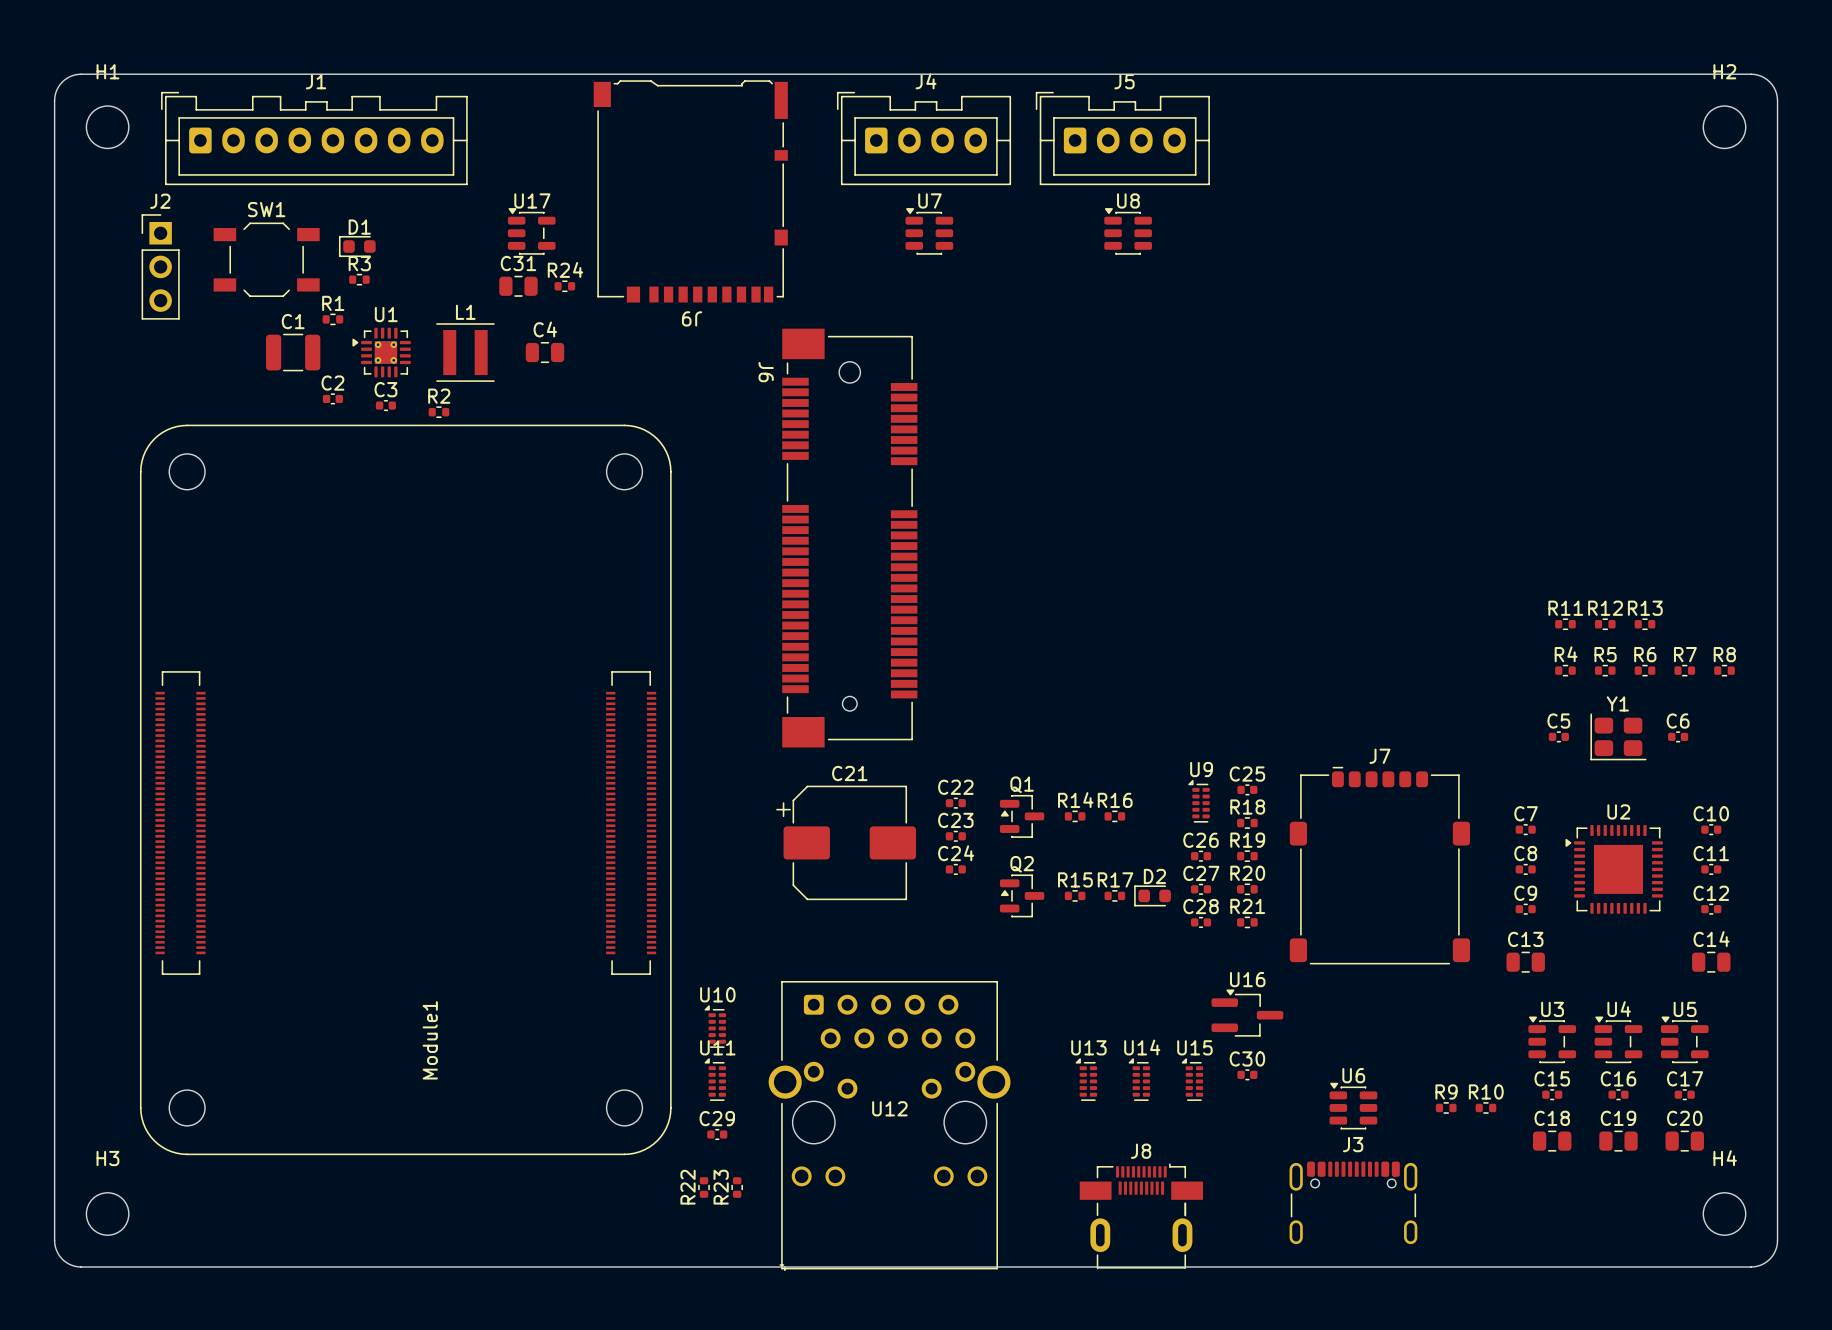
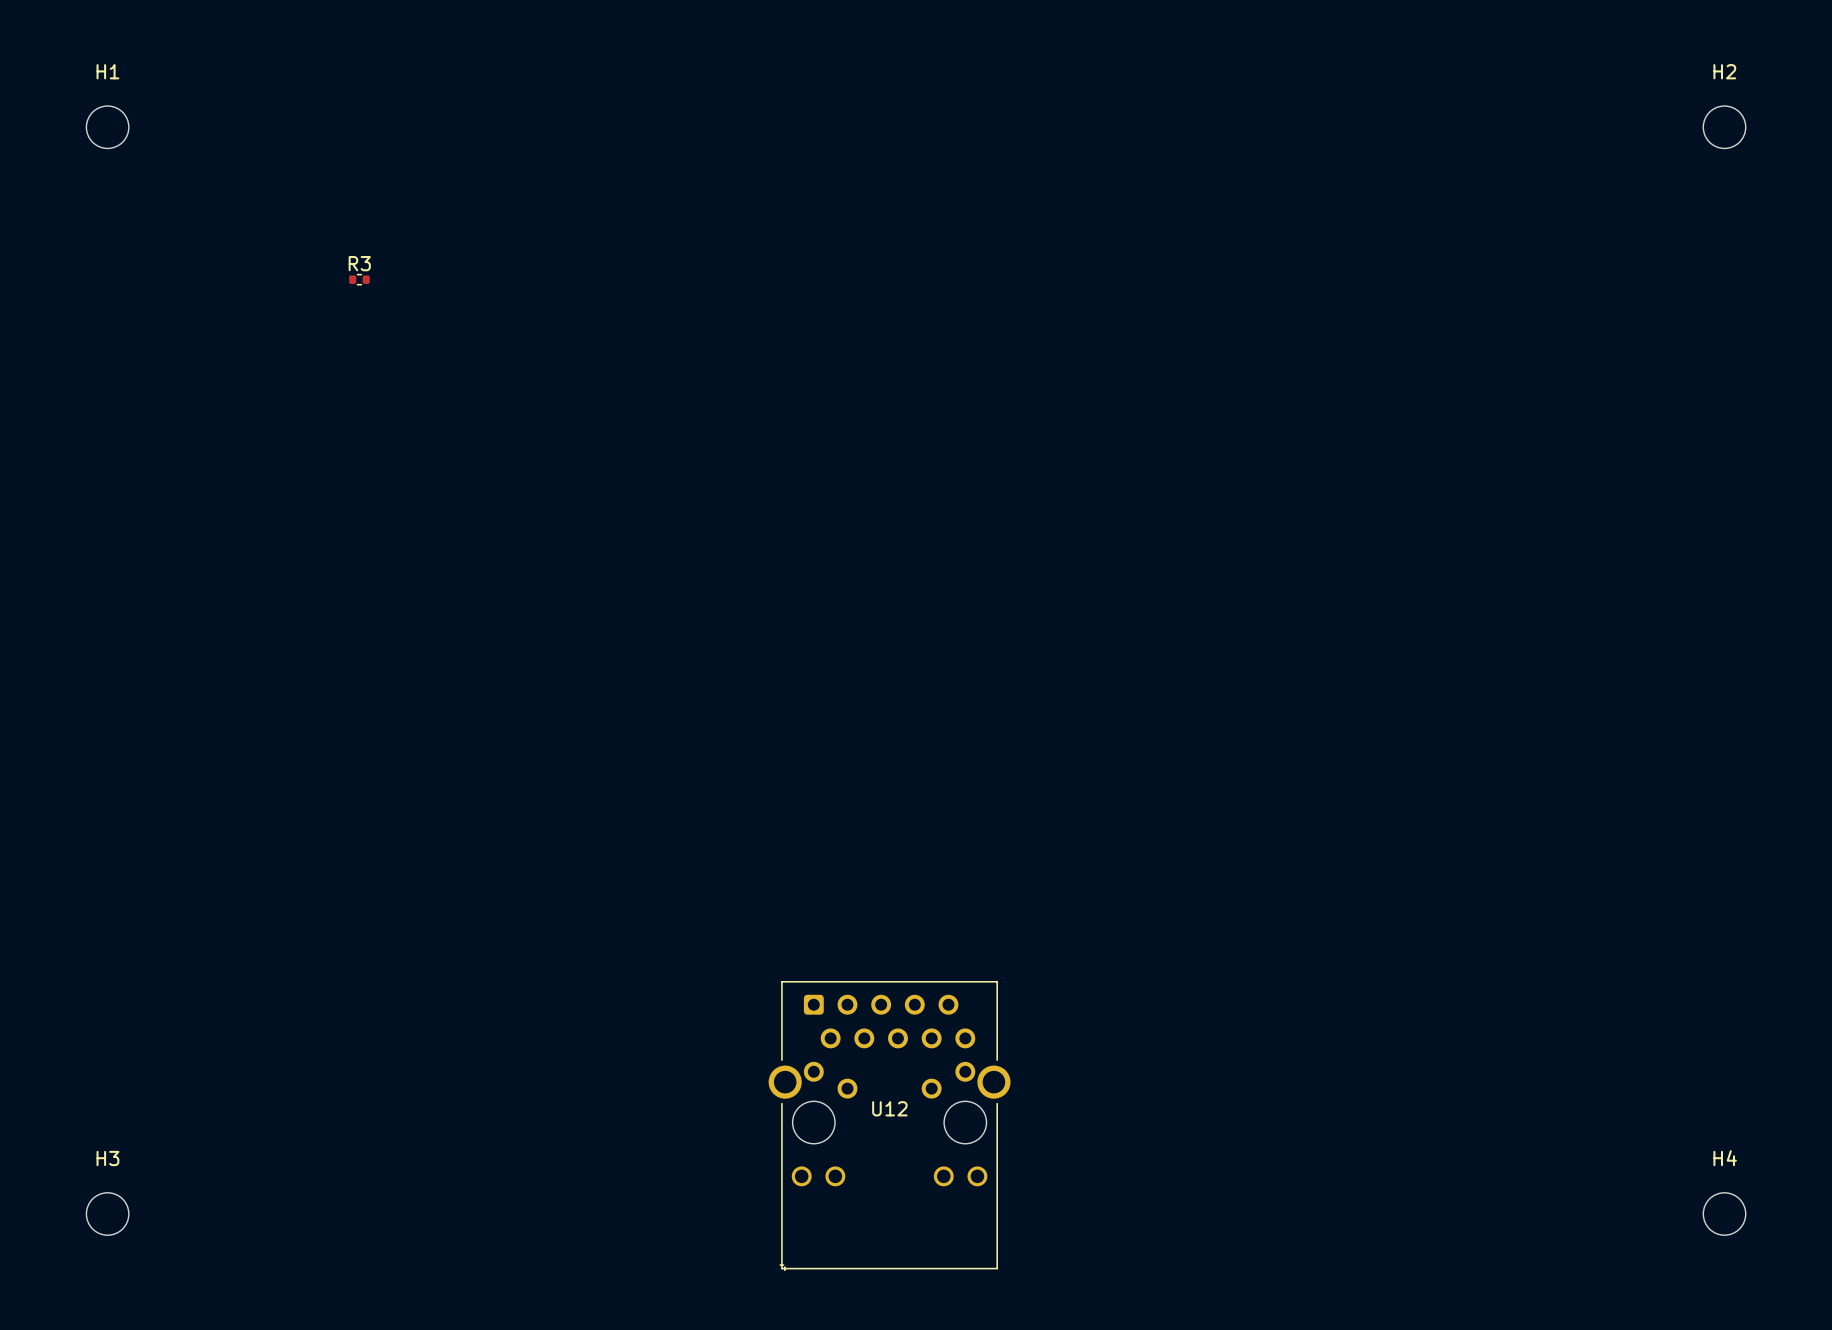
board edge: (81, 74) (1751, 74) (1767, 79) (1773, 87) (1777, 100) (1777, 1240) (1772, 1256) (1761, 1264) (1751, 1267) (81, 1267) (64, 1261) (58, 1253) (54, 1240) (54, 100) (57, 89) (62, 81) (69, 76) (81, 74) -> none
J1: (314, 138) -> none
J4: (924, 138) -> none
J5: (1122, 138) -> none
J9: (690, 191) -> none
U17: (531, 231) -> none
U7: (929, 231) -> none
U8: (1128, 231) -> none
D1: (357, 246) -> none
SW1: (266, 259) -> none
J2: (160, 266) -> none
C31: (518, 286) -> none
R24: (564, 286) -> none
R1: (332, 319) -> none
C1: (293, 352) -> none
U1: (381, 352) -> none
L1: (465, 352) -> none
C4: (544, 352) -> none
C2: (332, 398) -> none
C3: (385, 405) -> none
R2: (438, 412) -> none
J6: (849, 538) -> none
R11: (1565, 624) -> none
R12: (1605, 624) -> none
R13: (1645, 624) -> none
R4: (1565, 670) -> none
R5: (1605, 670) -> none
R6: (1645, 670) -> none
R7: (1684, 670) -> none
R8: (1724, 670) -> none
C5: (1558, 736) -> none
Y1: (1618, 736) -> none
C6: (1678, 736) -> none
Module1: (405, 789) -> none
C25: (1247, 789) -> none
U9: (1199, 801) -> none
C22: (955, 803) -> none
Q1: (1022, 816) -> none
R14: (1075, 816) -> none
R16: (1114, 816) -> none
R18: (1247, 823) -> none
C7: (1525, 829) -> none
C10: (1711, 829) -> none
C23: (955, 836) -> none
C21: (846, 842) -> none
C26: (1201, 856) -> none
R19: (1247, 856) -> none
J7: (1379, 865) -> none
C24: (955, 869) -> none
C8: (1525, 869) -> none
U2: (1614, 869) -> none
C11: (1711, 869) -> none
C27: (1201, 889) -> none
R20: (1247, 889) -> none
Q2: (1022, 895) -> none
R15: (1075, 895) -> none
R17: (1114, 895) -> none
D2: (1152, 895) -> none
C9: (1525, 909) -> none
C12: (1711, 909) -> none
C28: (1201, 922) -> none
R21: (1247, 922) -> none
C13: (1525, 962) -> none
C14: (1711, 962) -> none
U16: (1247, 1013) -> none
U10: (715, 1026) -> none
U3: (1552, 1039) -> none
U4: (1618, 1039) -> none
U5: (1684, 1039) -> none
C30: (1247, 1074) -> none
U11: (715, 1079) -> none
U13: (1086, 1079) -> none
U14: (1139, 1079) -> none
U15: (1192, 1079) -> none
C15: (1552, 1094) -> none
C16: (1618, 1094) -> none
C17: (1684, 1094) -> none
U6: (1353, 1106) -> none
R9: (1446, 1107) -> none
R10: (1485, 1107) -> none
C29: (717, 1134) -> none
C18: (1552, 1141) -> none
C19: (1618, 1141) -> none
C20: (1684, 1141) -> none
R22: (704, 1187) -> none
R23: (737, 1187) -> none
J3: (1353, 1202) -> none
J8: (1141, 1215) -> none

